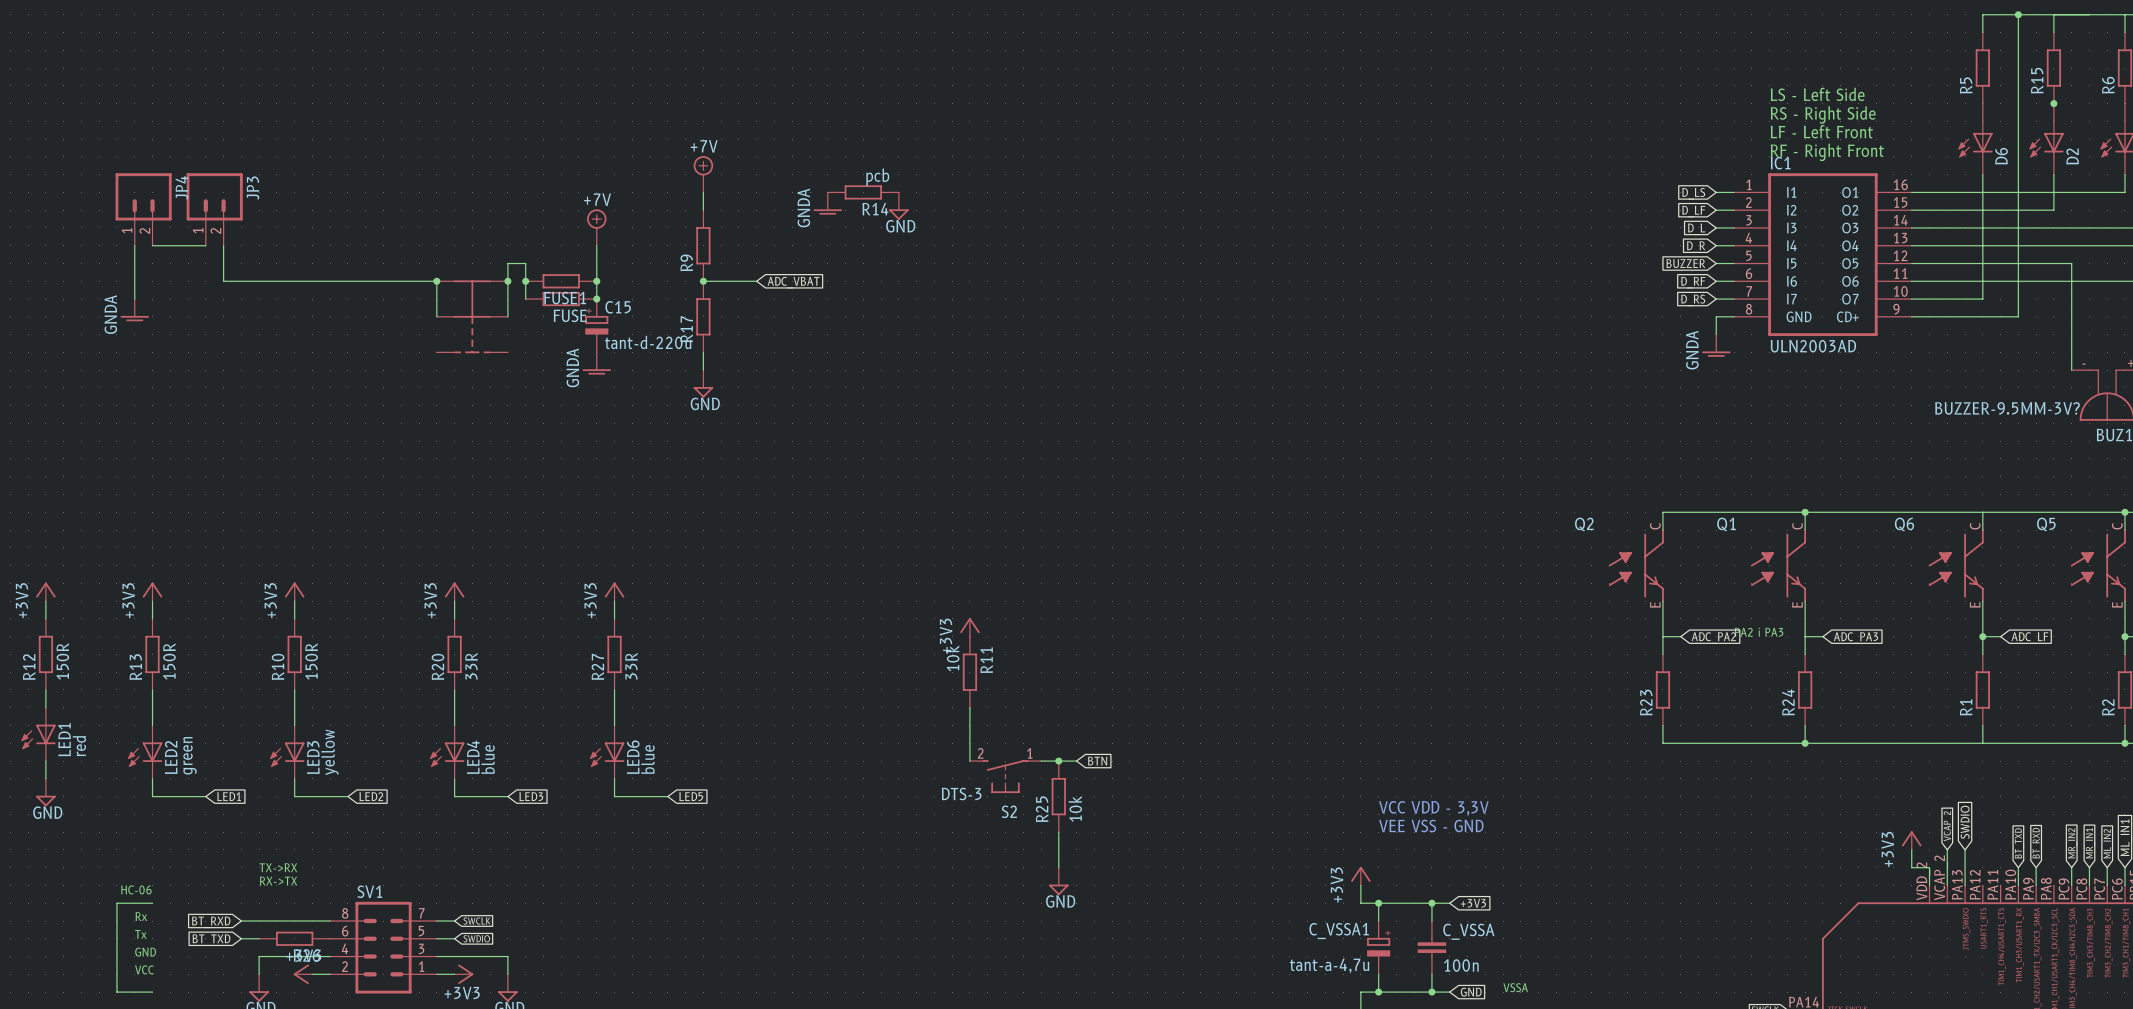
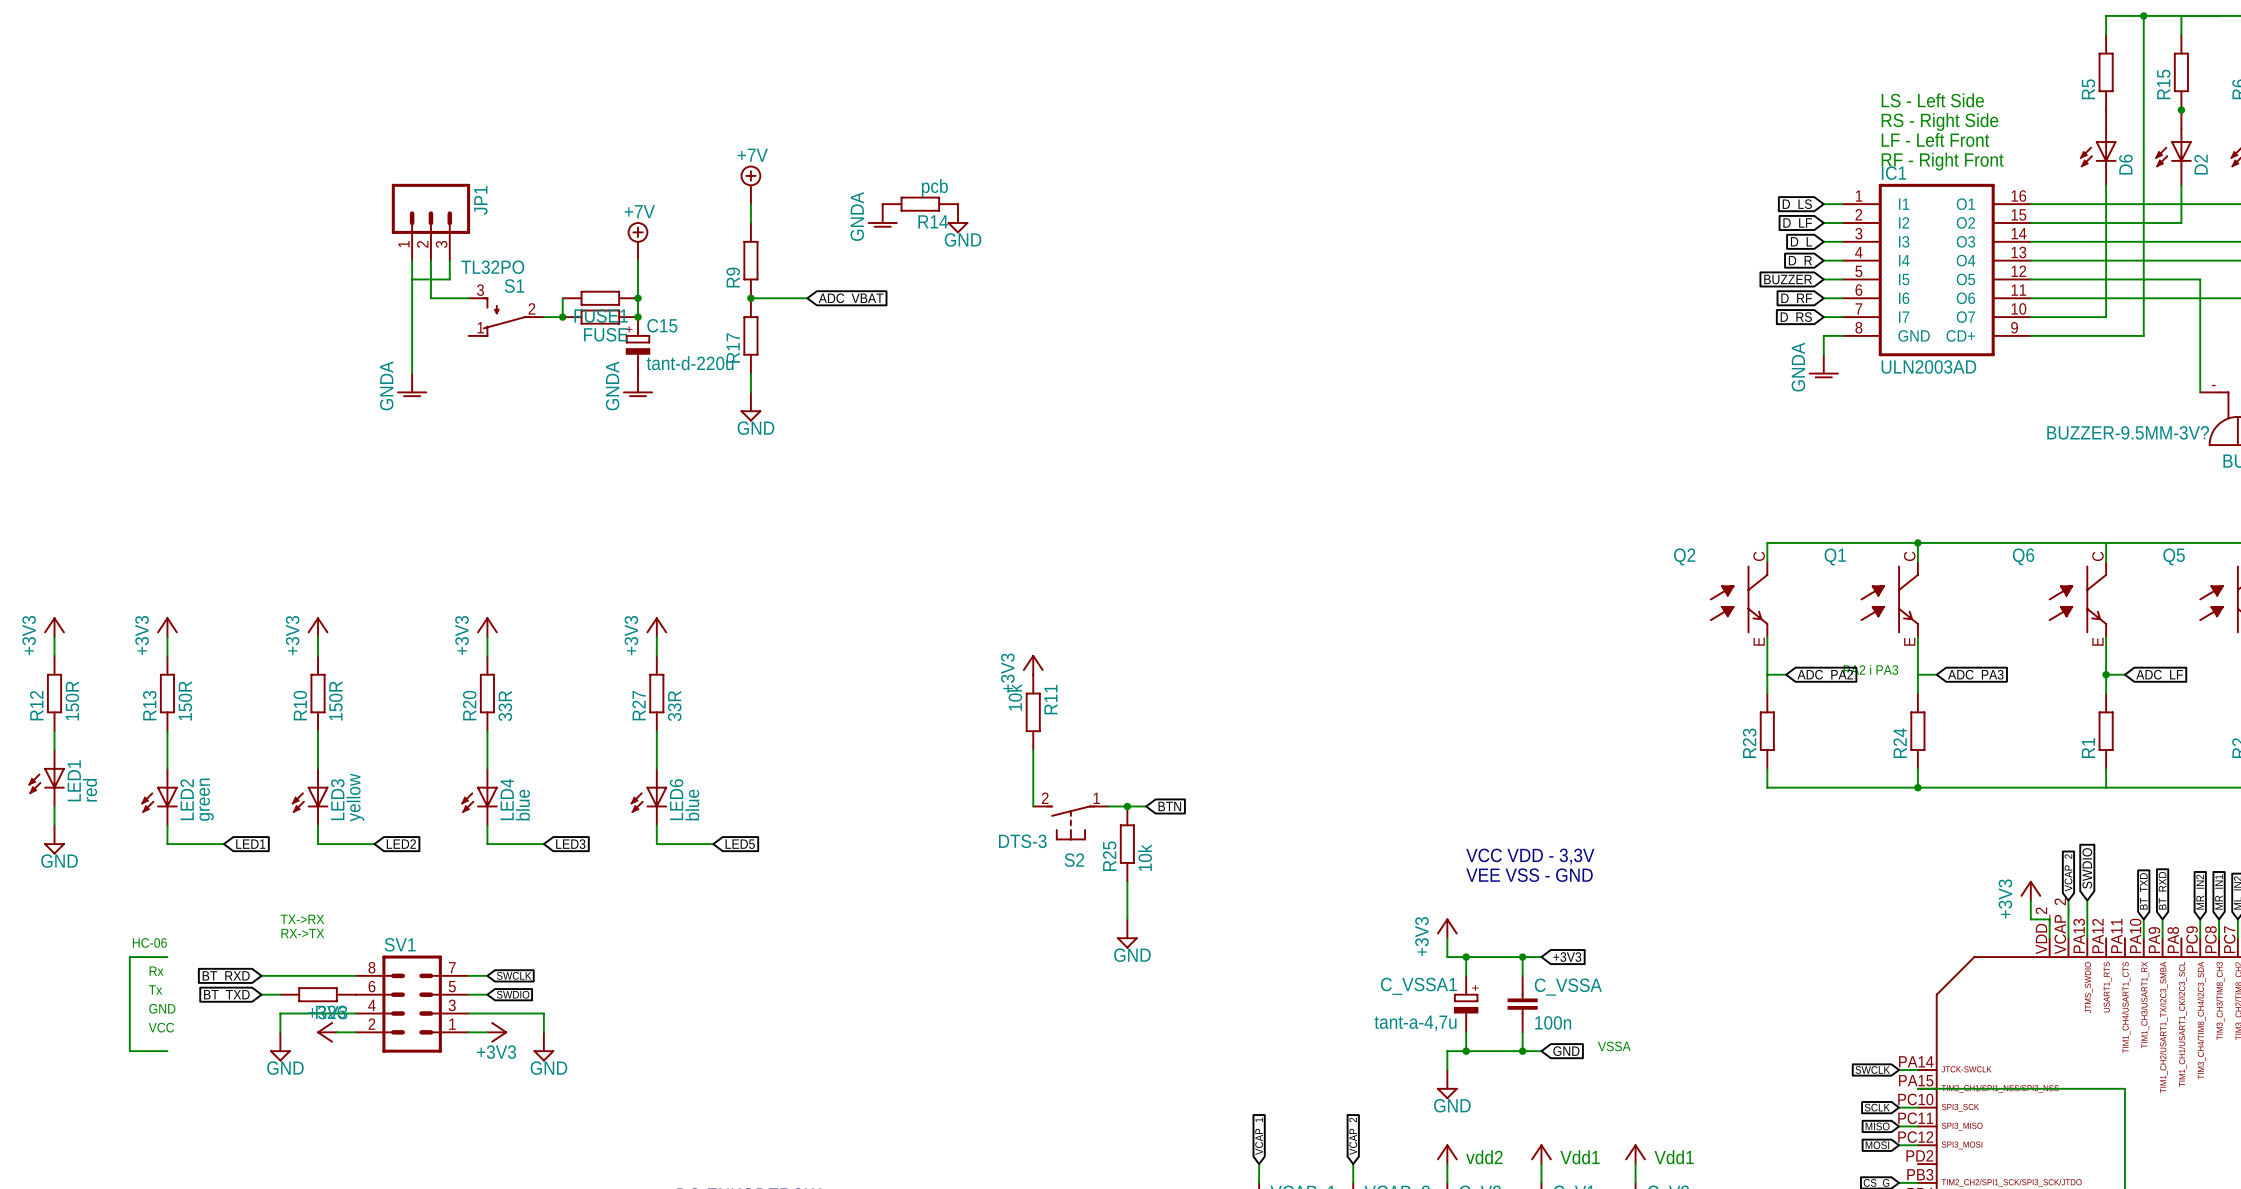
JP4: (143, 209) -> none
JP3: (214, 209) -> none
JP1: none -> (430, 222)
wire: (134, 245) (134, 299) -> none
wire: (152, 245) (205, 245) -> none
wire: (223, 245) (223, 281) (401, 281) -> (430, 260) (430, 298)
wire: none -> (412, 260) (412, 373)
wire: none -> (449, 260) (449, 279) (412, 279)
wire: (436, 281) (436, 316) -> none
junction: (436, 281) -> none
junction: (507, 281) -> none
wire: (525, 281) (525, 263) (507, 263) (507, 316) -> none
junction: (525, 281) -> none
S1: none -> TL32PO (506, 317)
wire: none -> (543, 317) (562, 317)
junction: none -> (562, 317)
power symbol: GNDA (134, 310) -> none
part: (472, 316) -> none
power symbol: none -> GNDA (412, 385)

